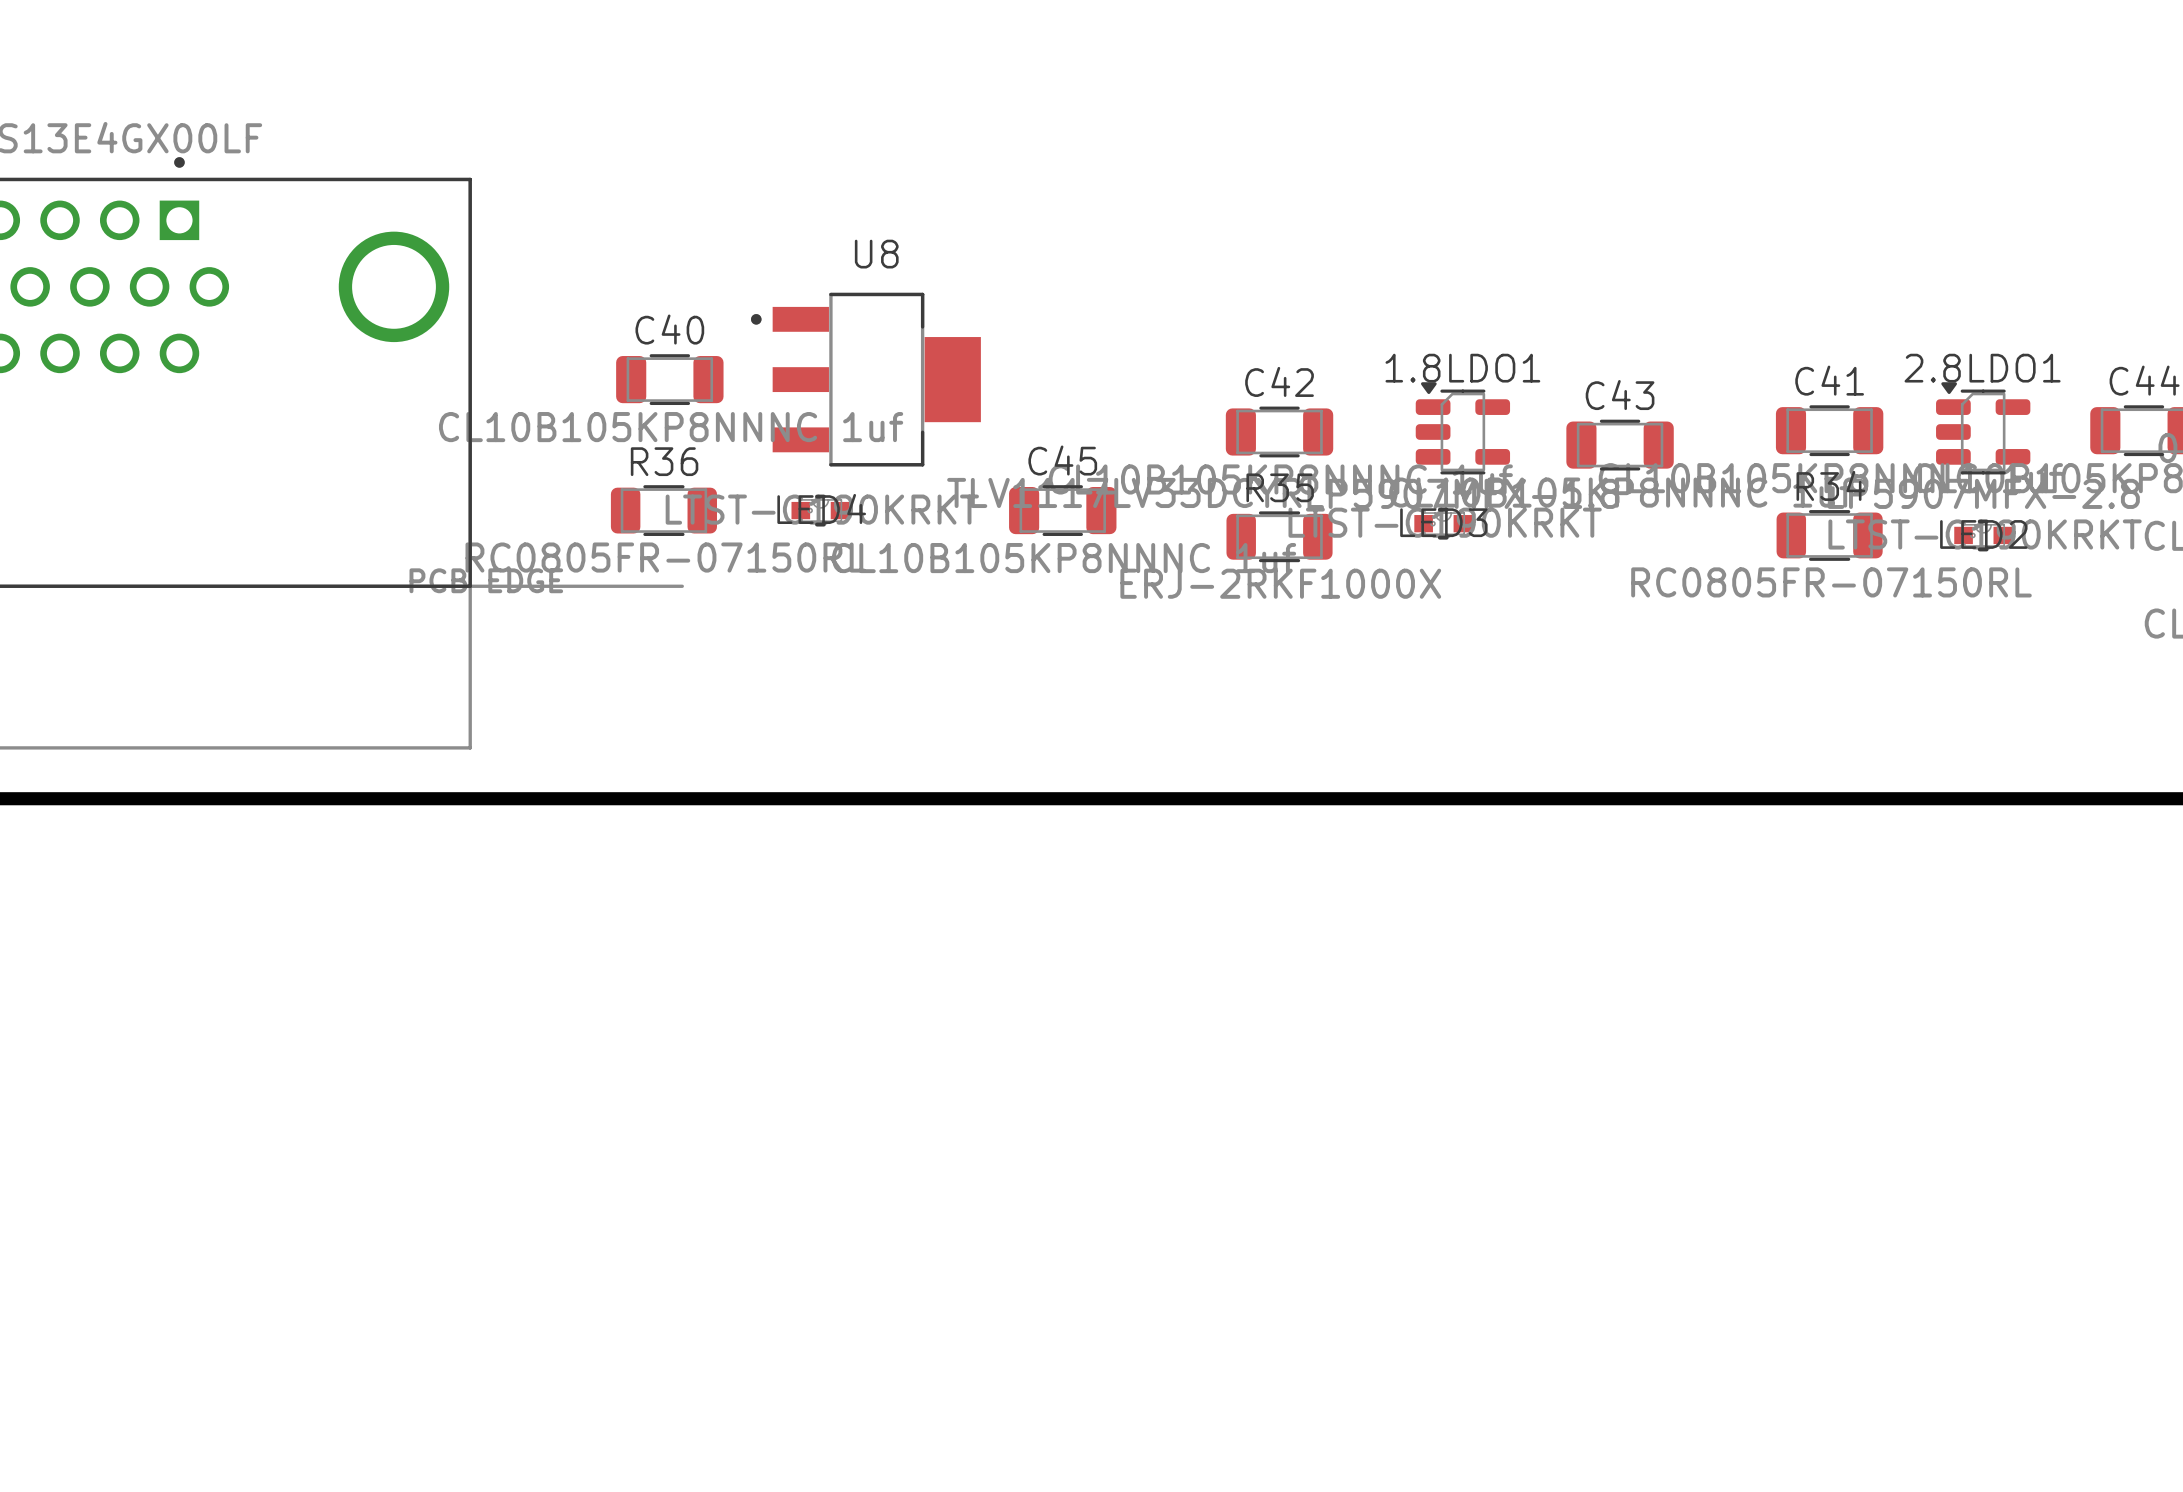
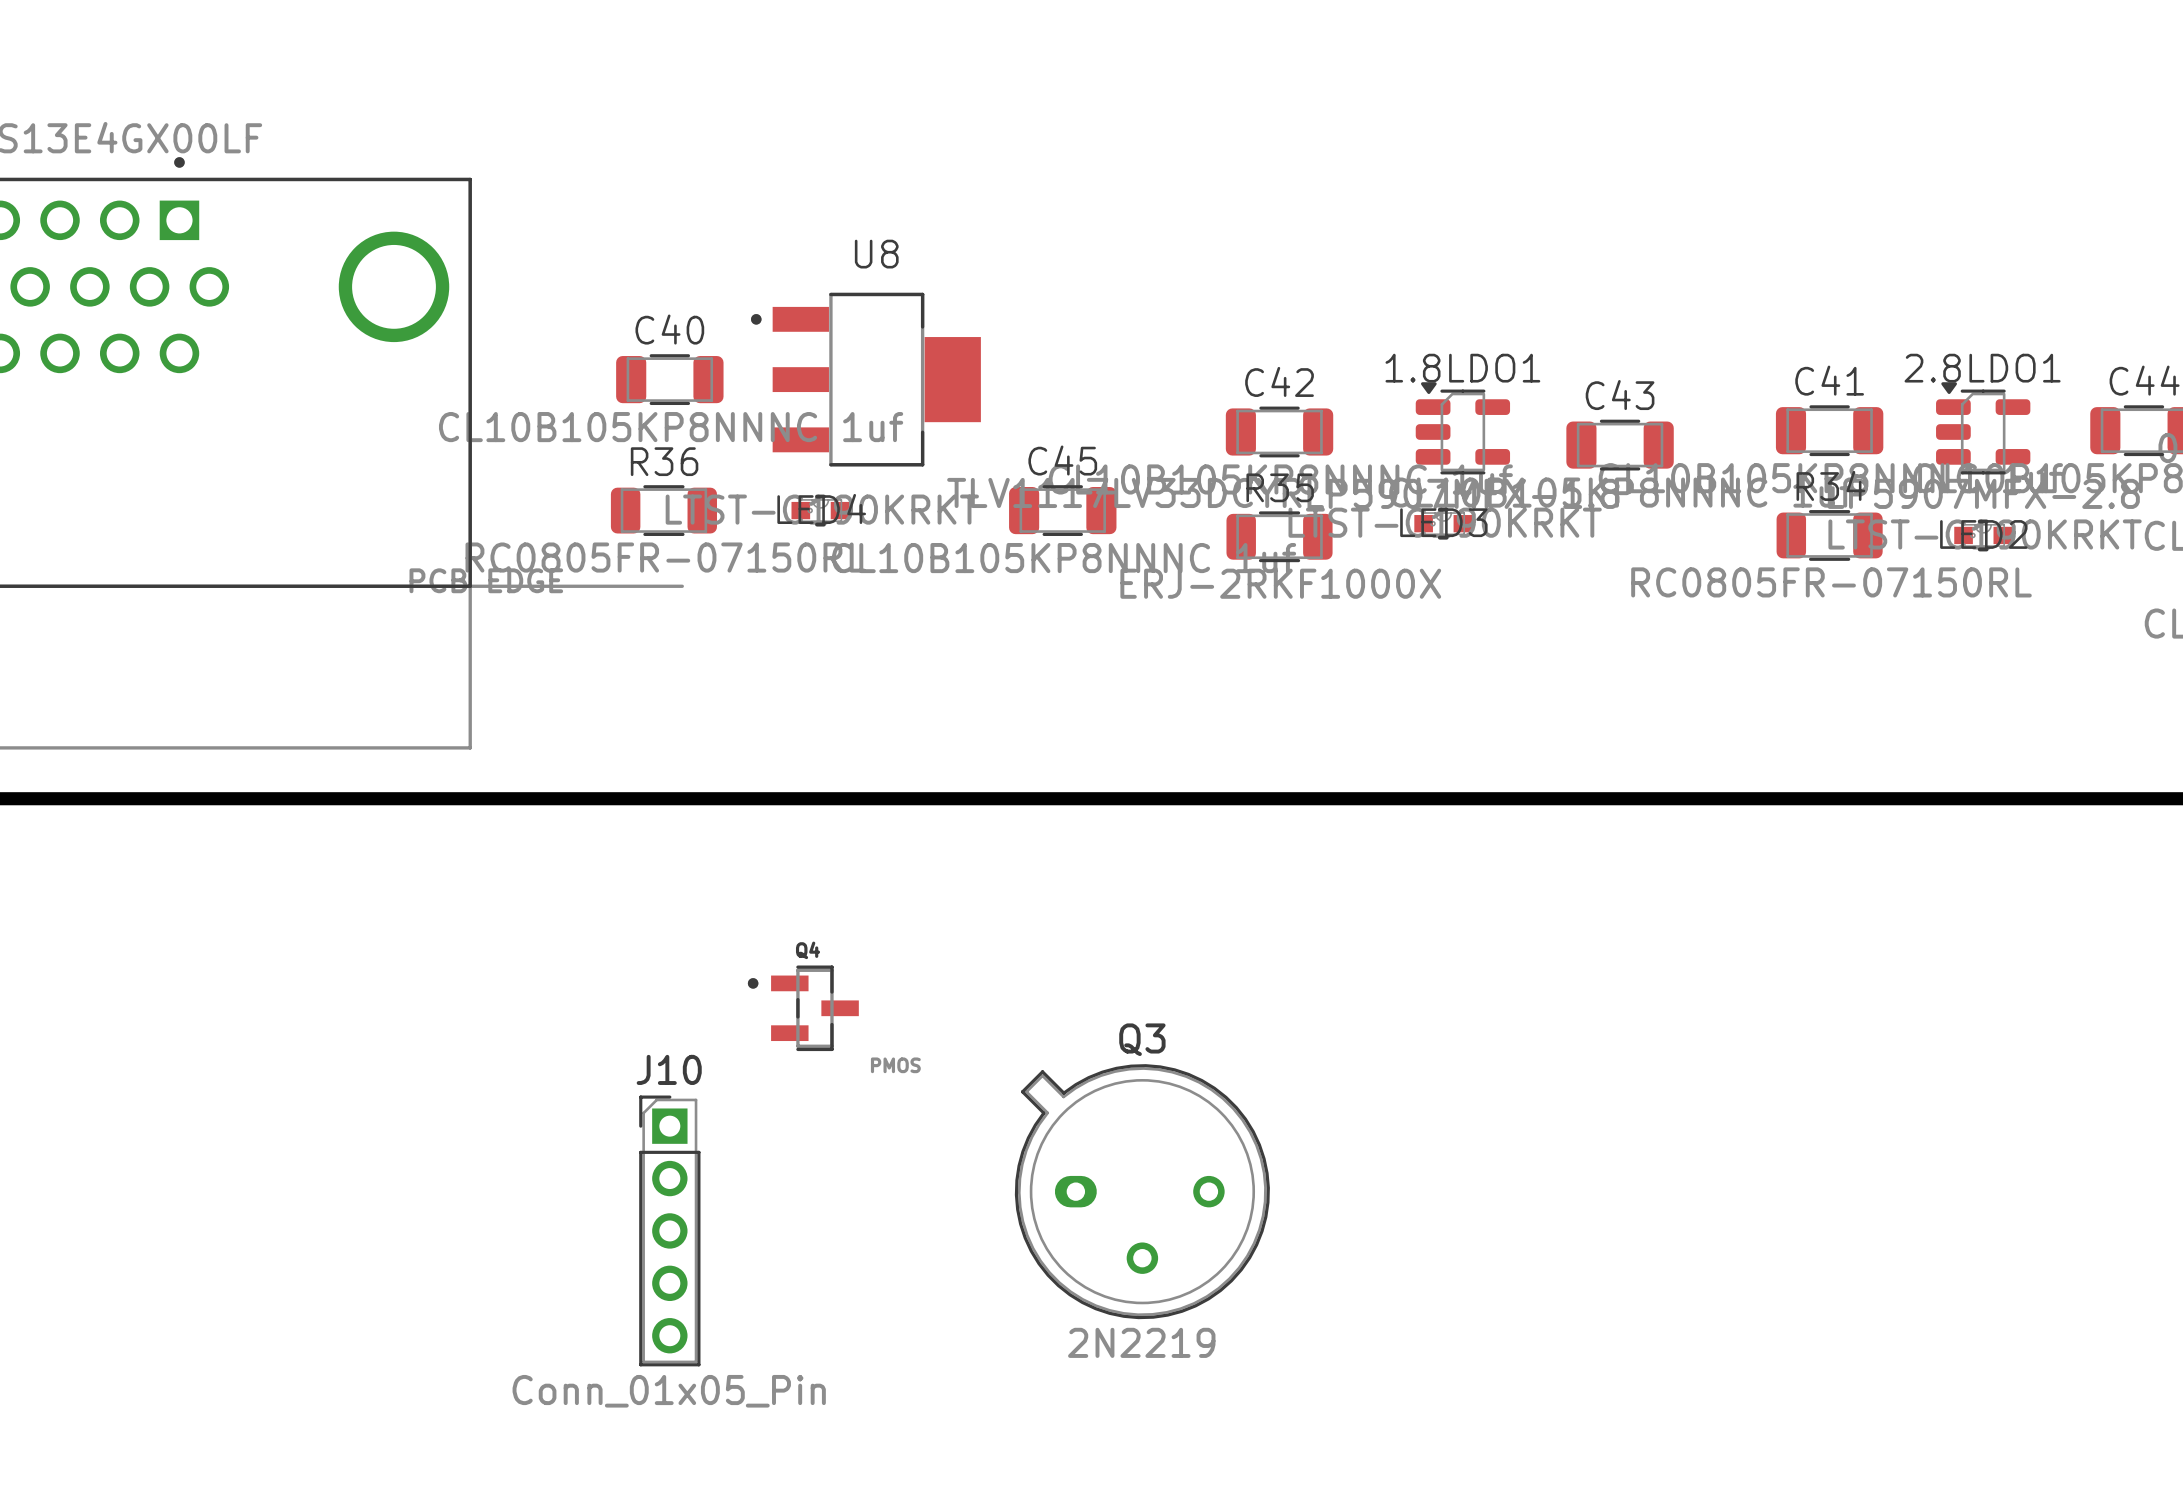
Q4: none -> PMOS (803, 1008)
Q3: none -> 2N2219 (1142, 1191)
J10: none -> Conn_01x05_Pin (669, 1230)

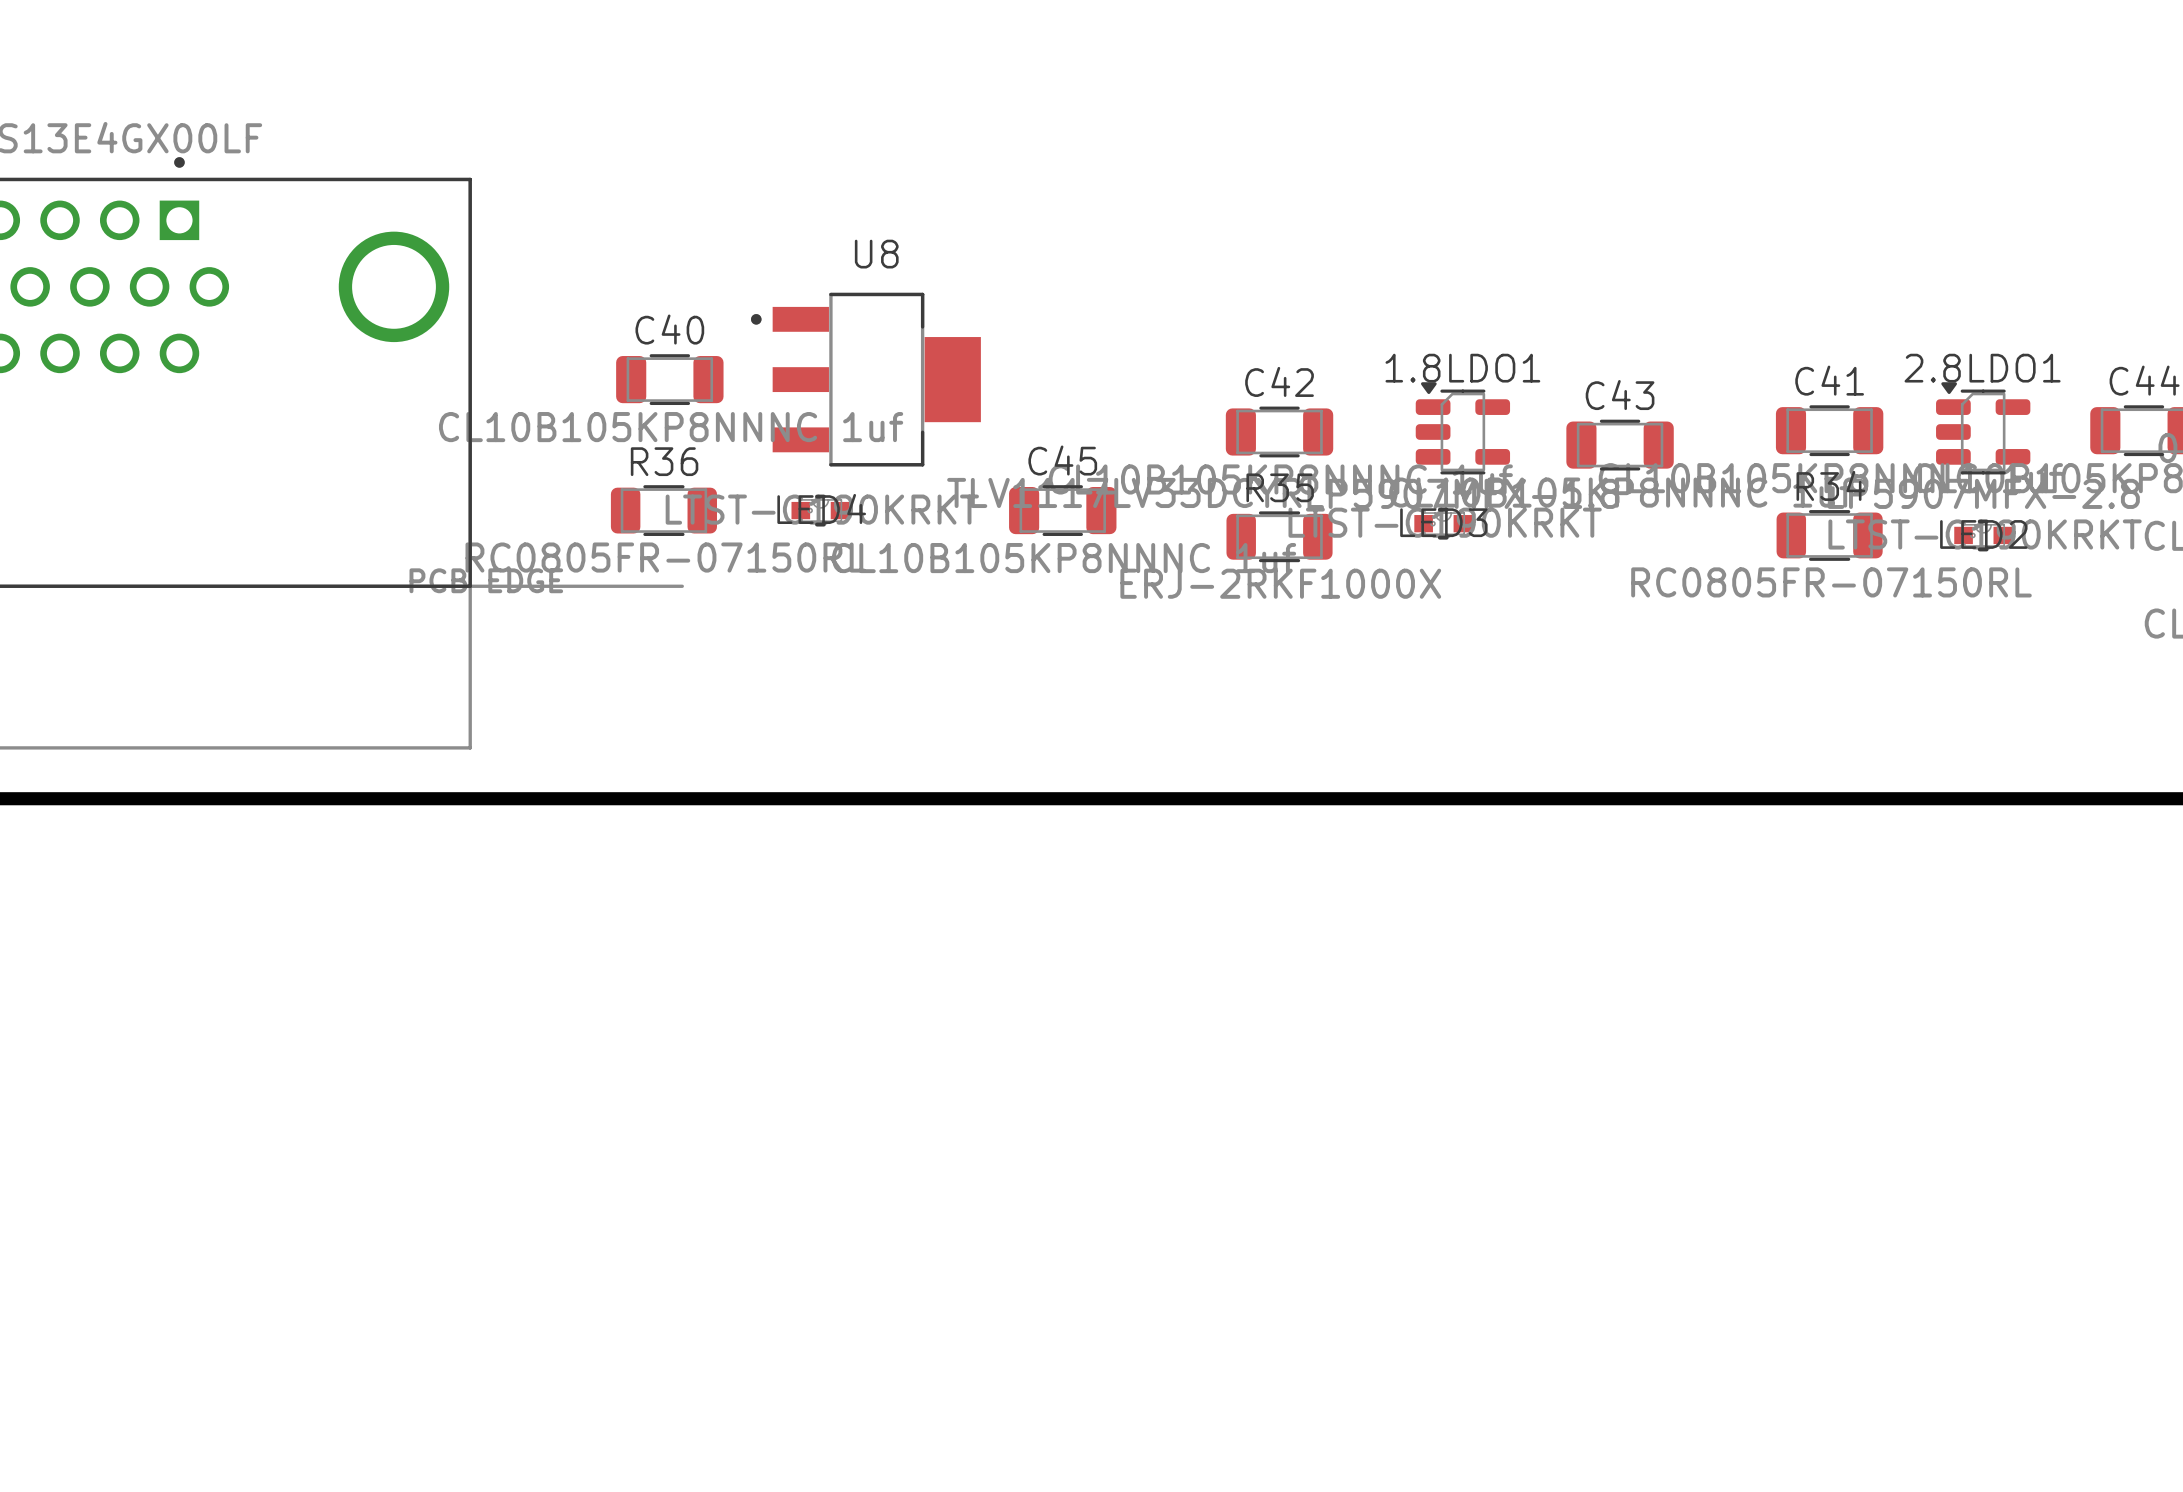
Q4: PMOS (803, 1008) -> none
Q3: 2N2219 (1142, 1191) -> none
J10: Conn_01x05_Pin (669, 1230) -> none

